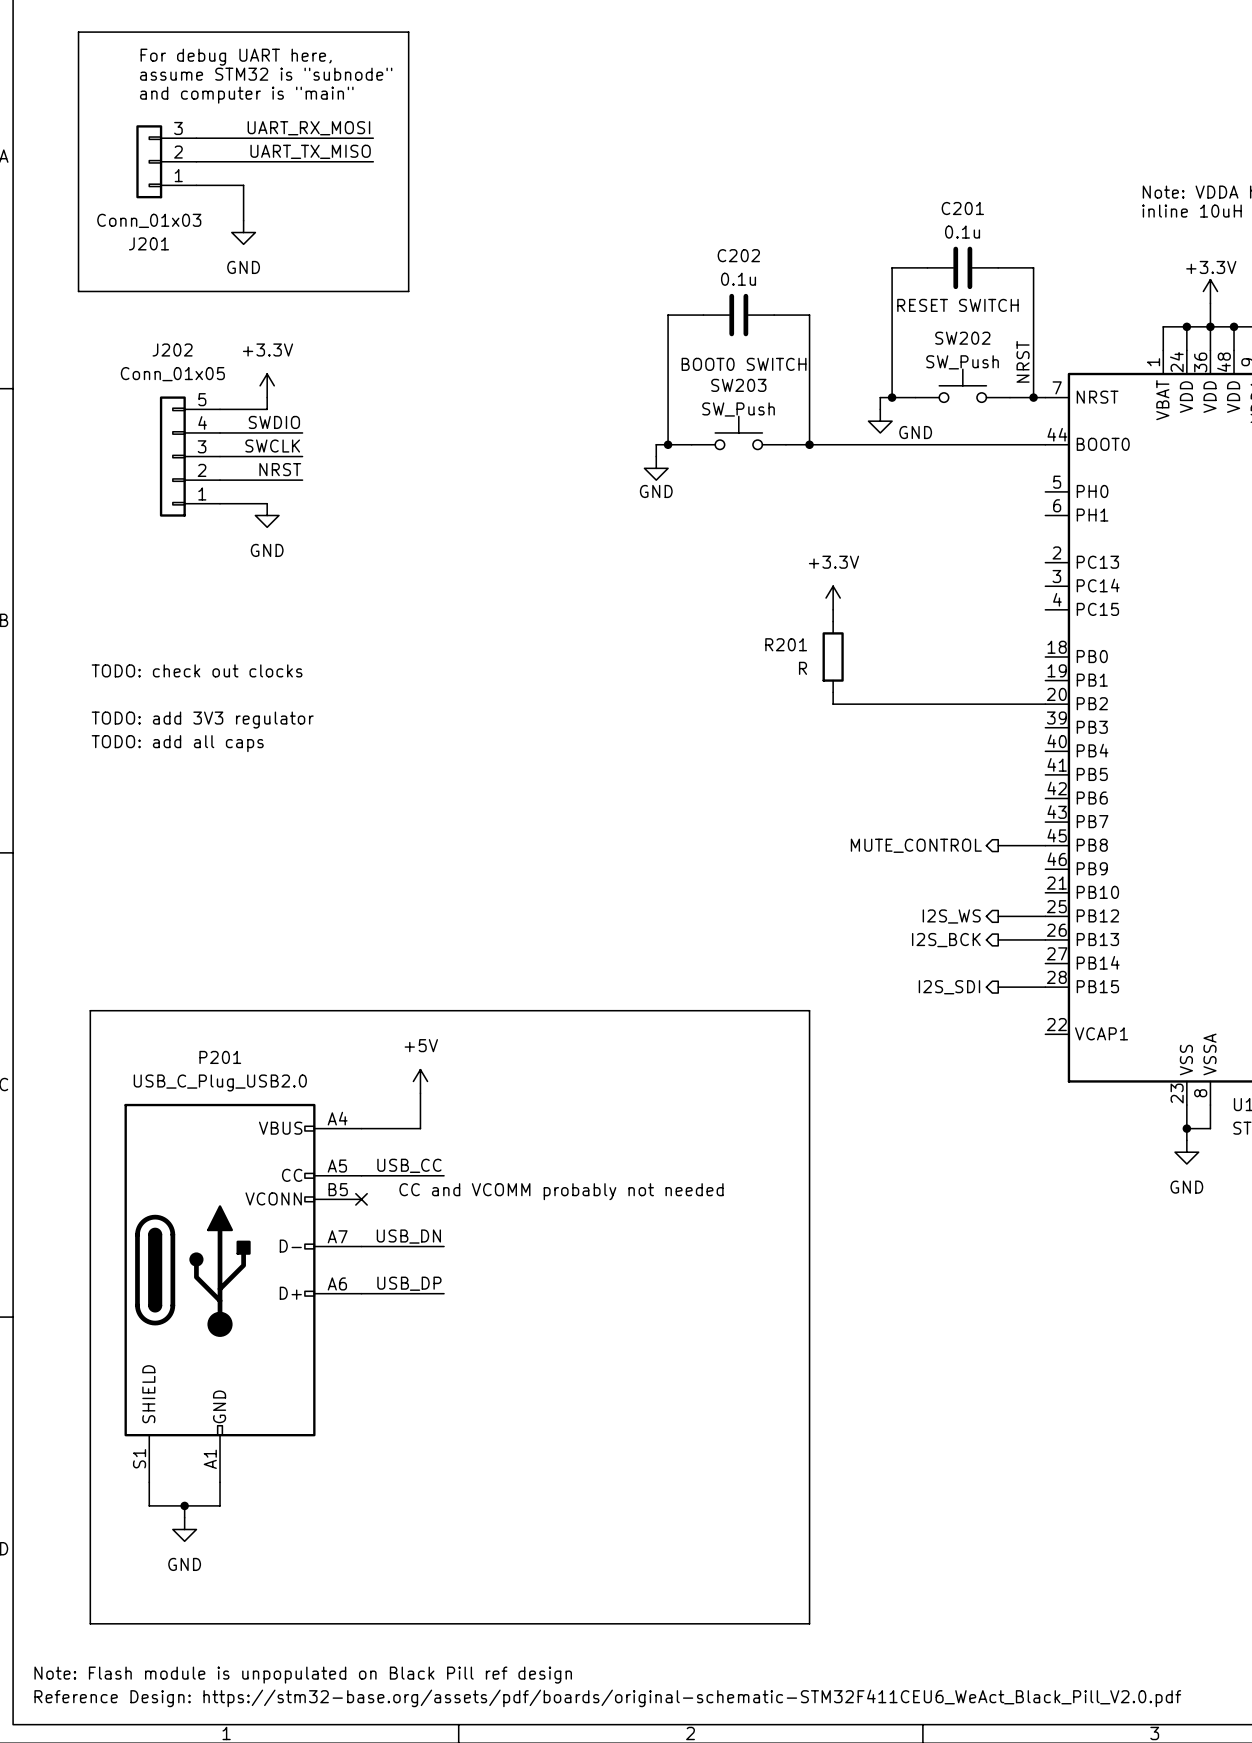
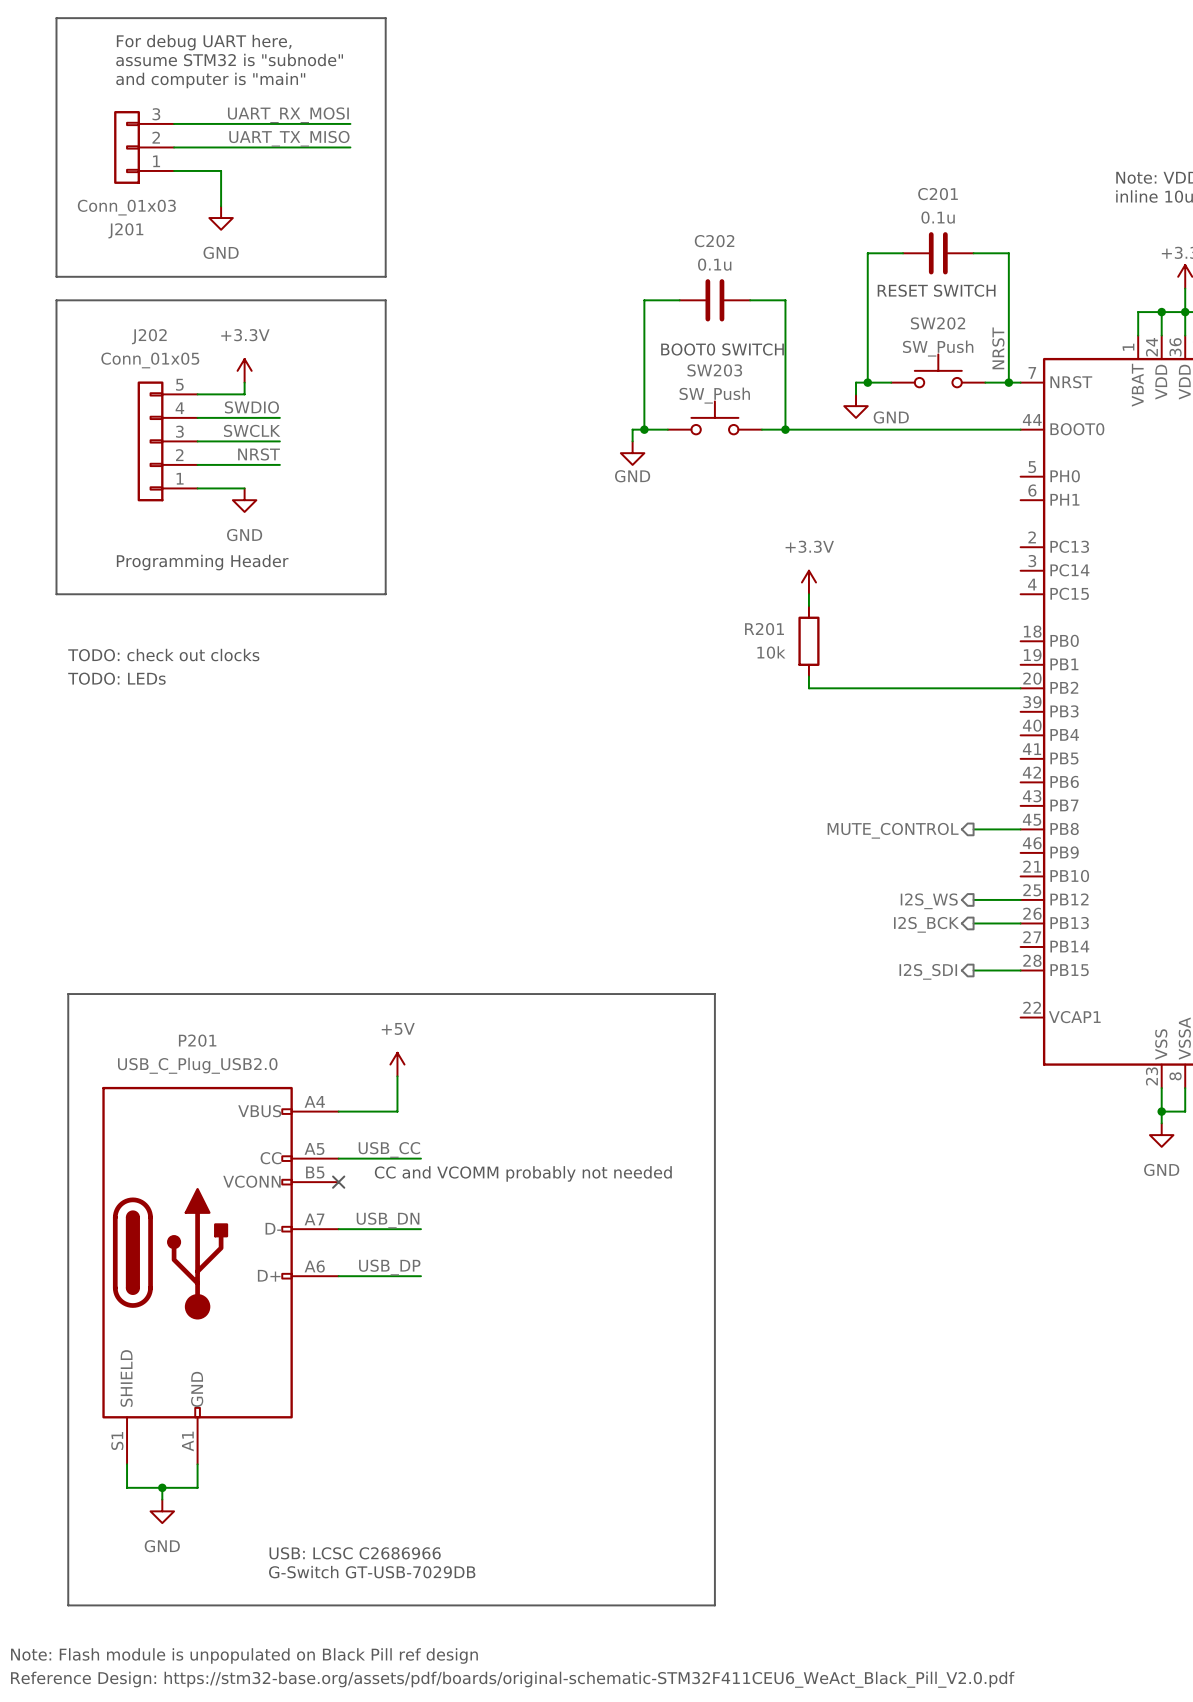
line: none -> (56, 300) (385, 300) (385, 594) (56, 594) (56, 300)
text: none -> Programming Header (202, 562)
R201 value: R (803, 668) -> 10k (771, 652)
text: none -> TODO: LEDs (116, 678)
text: TODO: add 3V3 regulator (202, 720) -> none
text: TODO: add all caps (177, 743) -> none
line: (738, 1010) (809, 1010) (809, 1623) (738, 1623) -> (714, 994) (714, 1605)
text: none -> USB: LCSC C2686966 (355, 1553)
text: none -> G-Switch GT-USB-7029DB (372, 1572)

